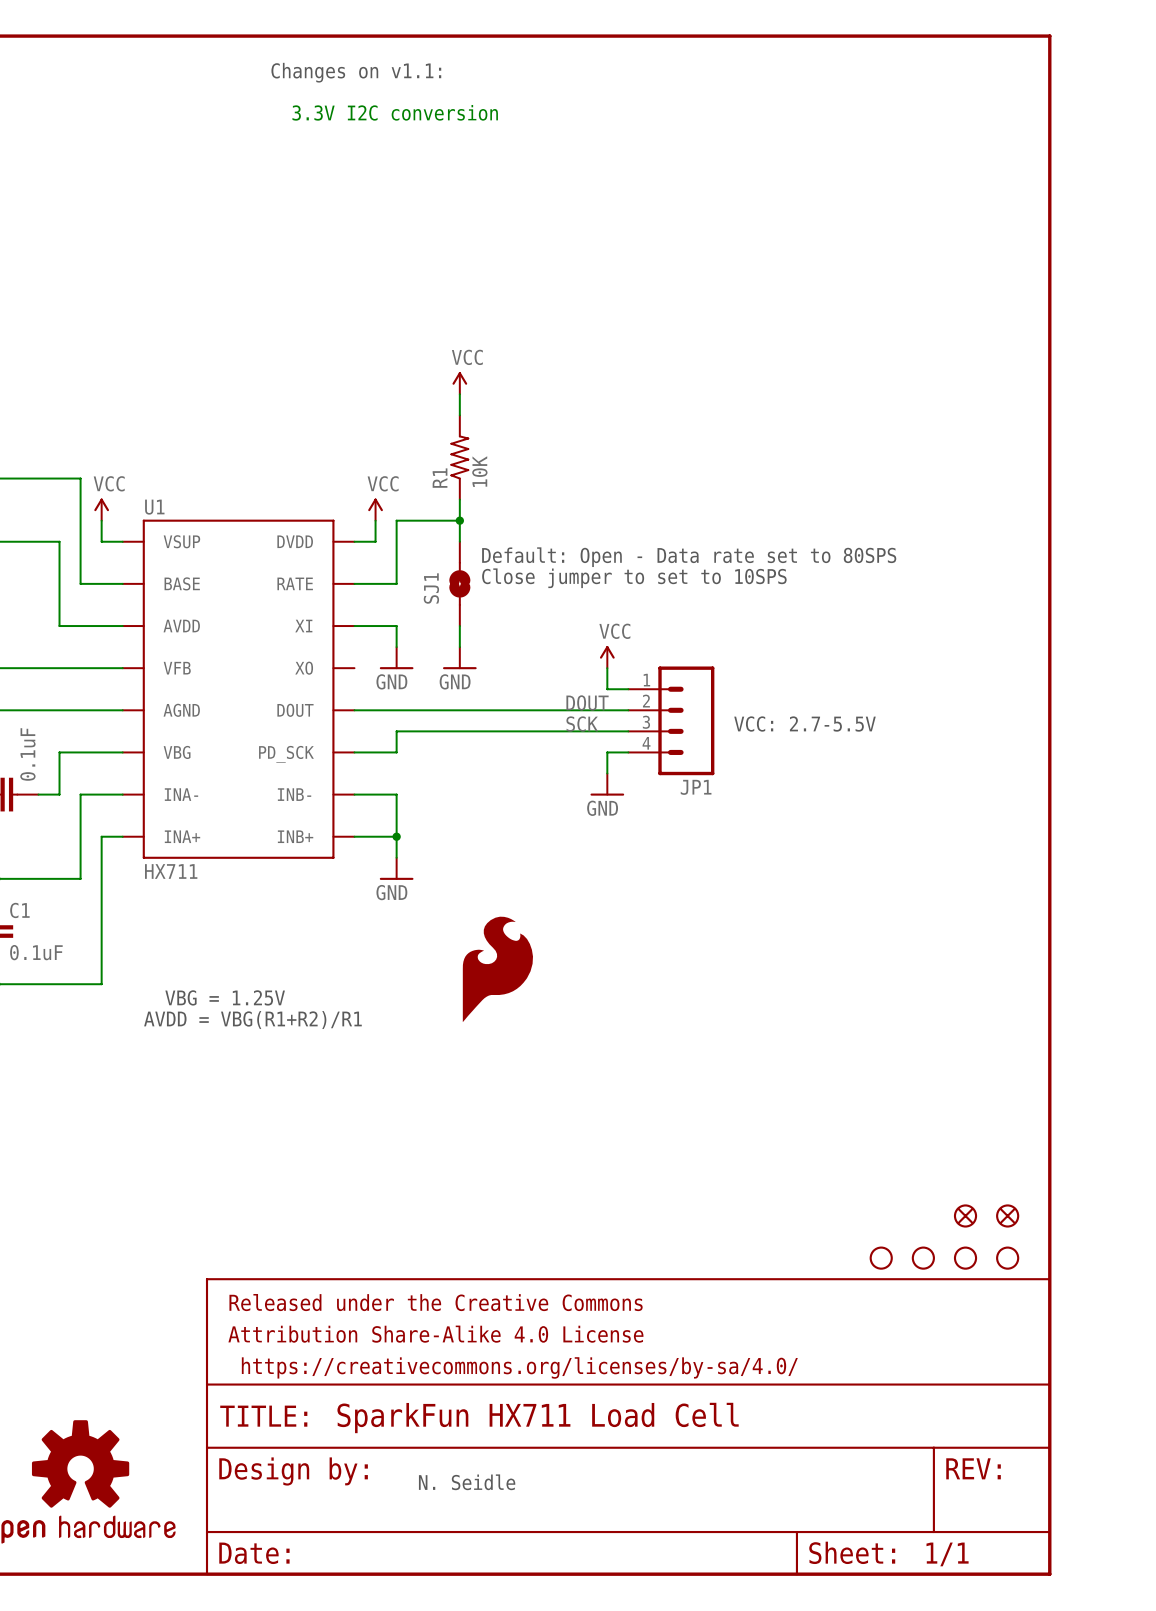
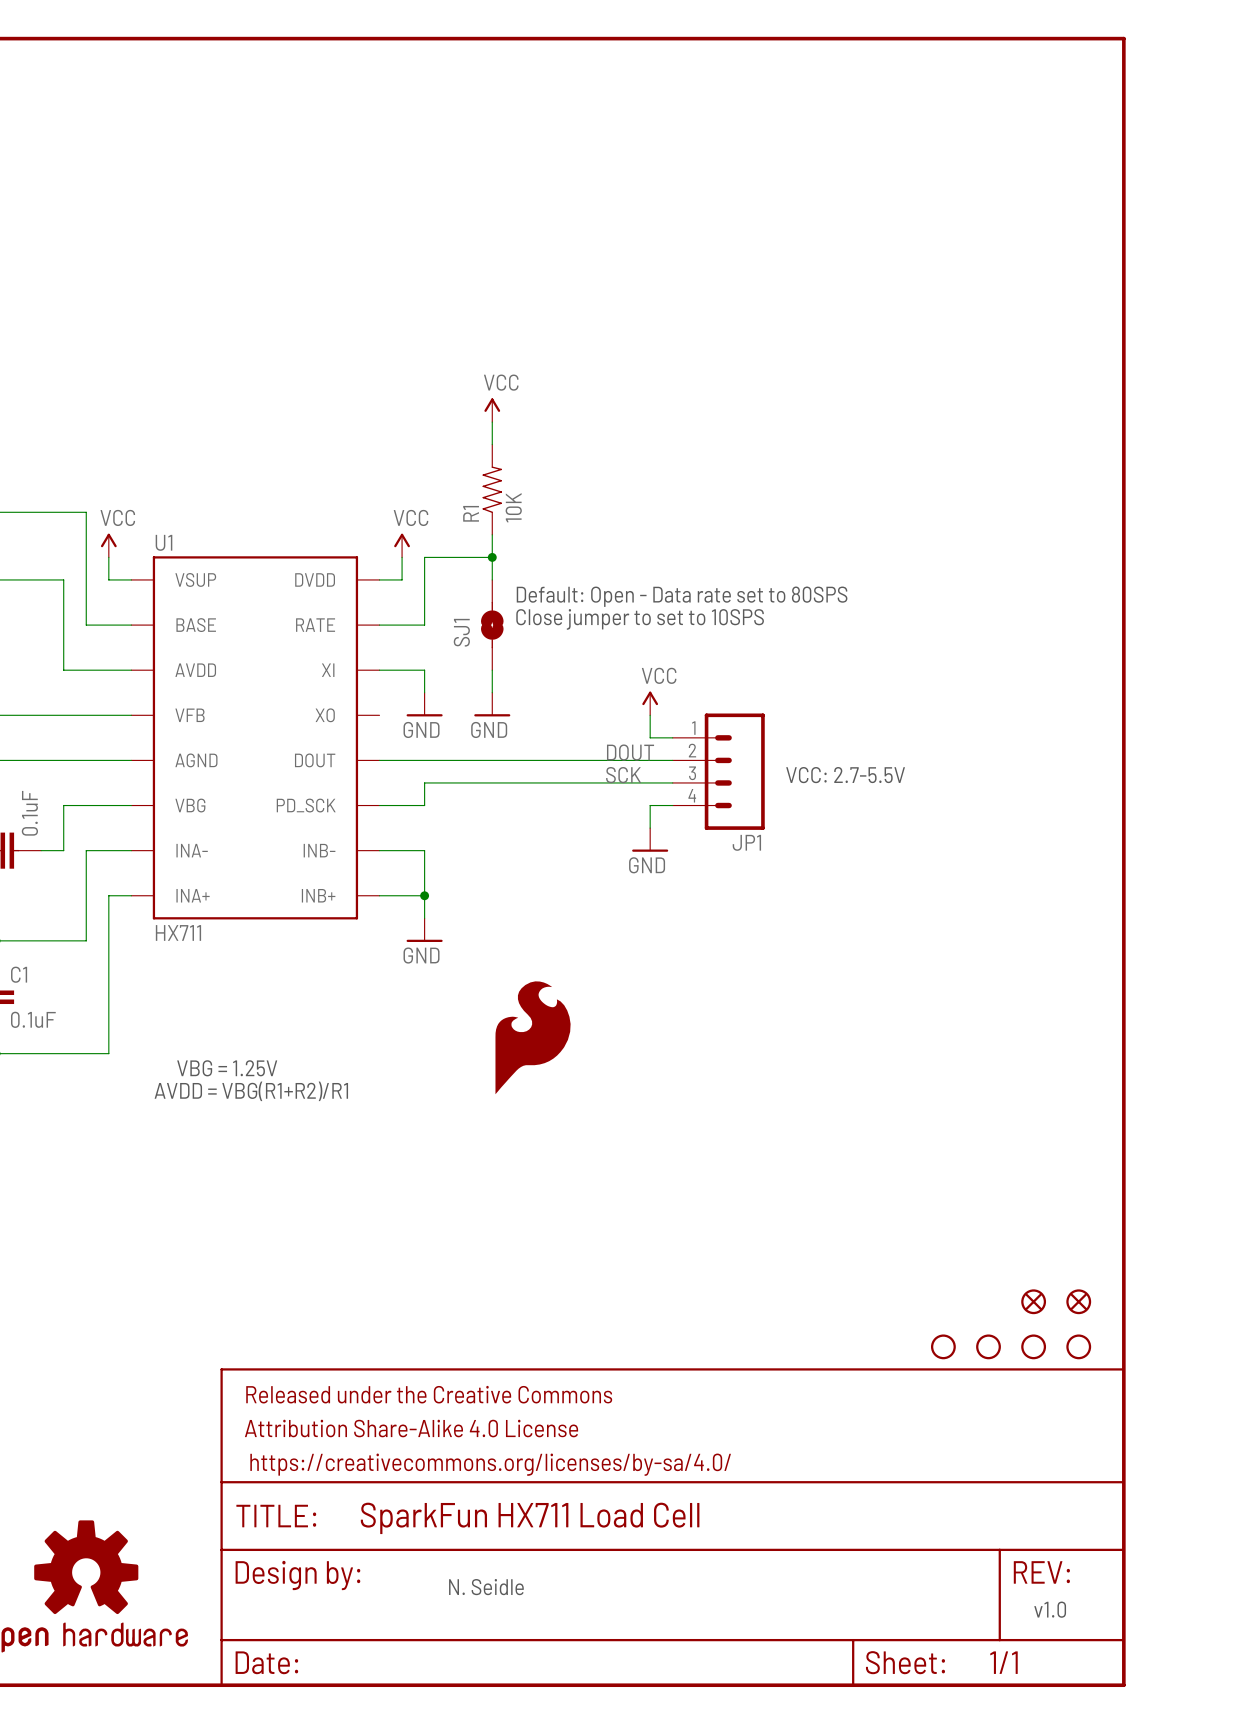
text: Changes on v1.1: (356, 72) -> none
text: 3.3V I2C conversion (395, 112) -> none
text: none -> v1.0 (1050, 1609)

